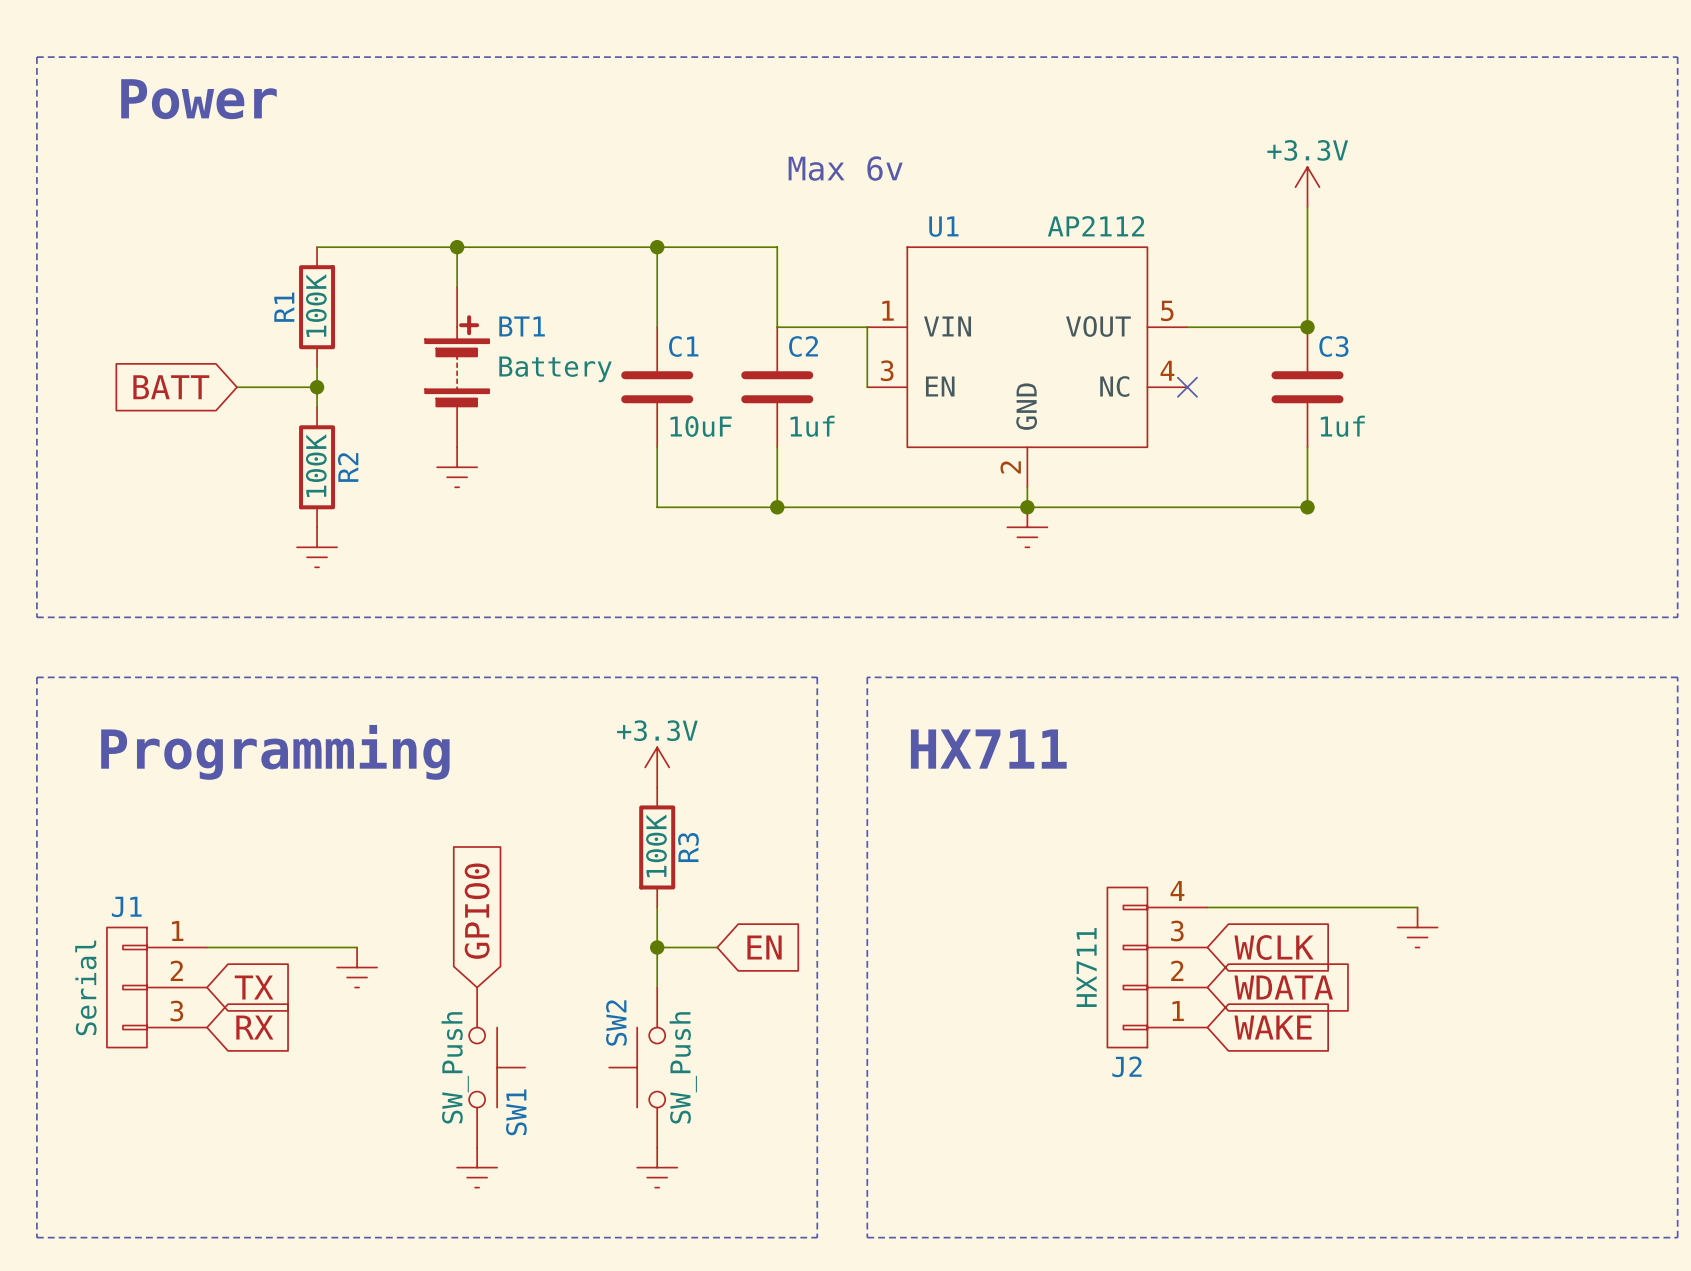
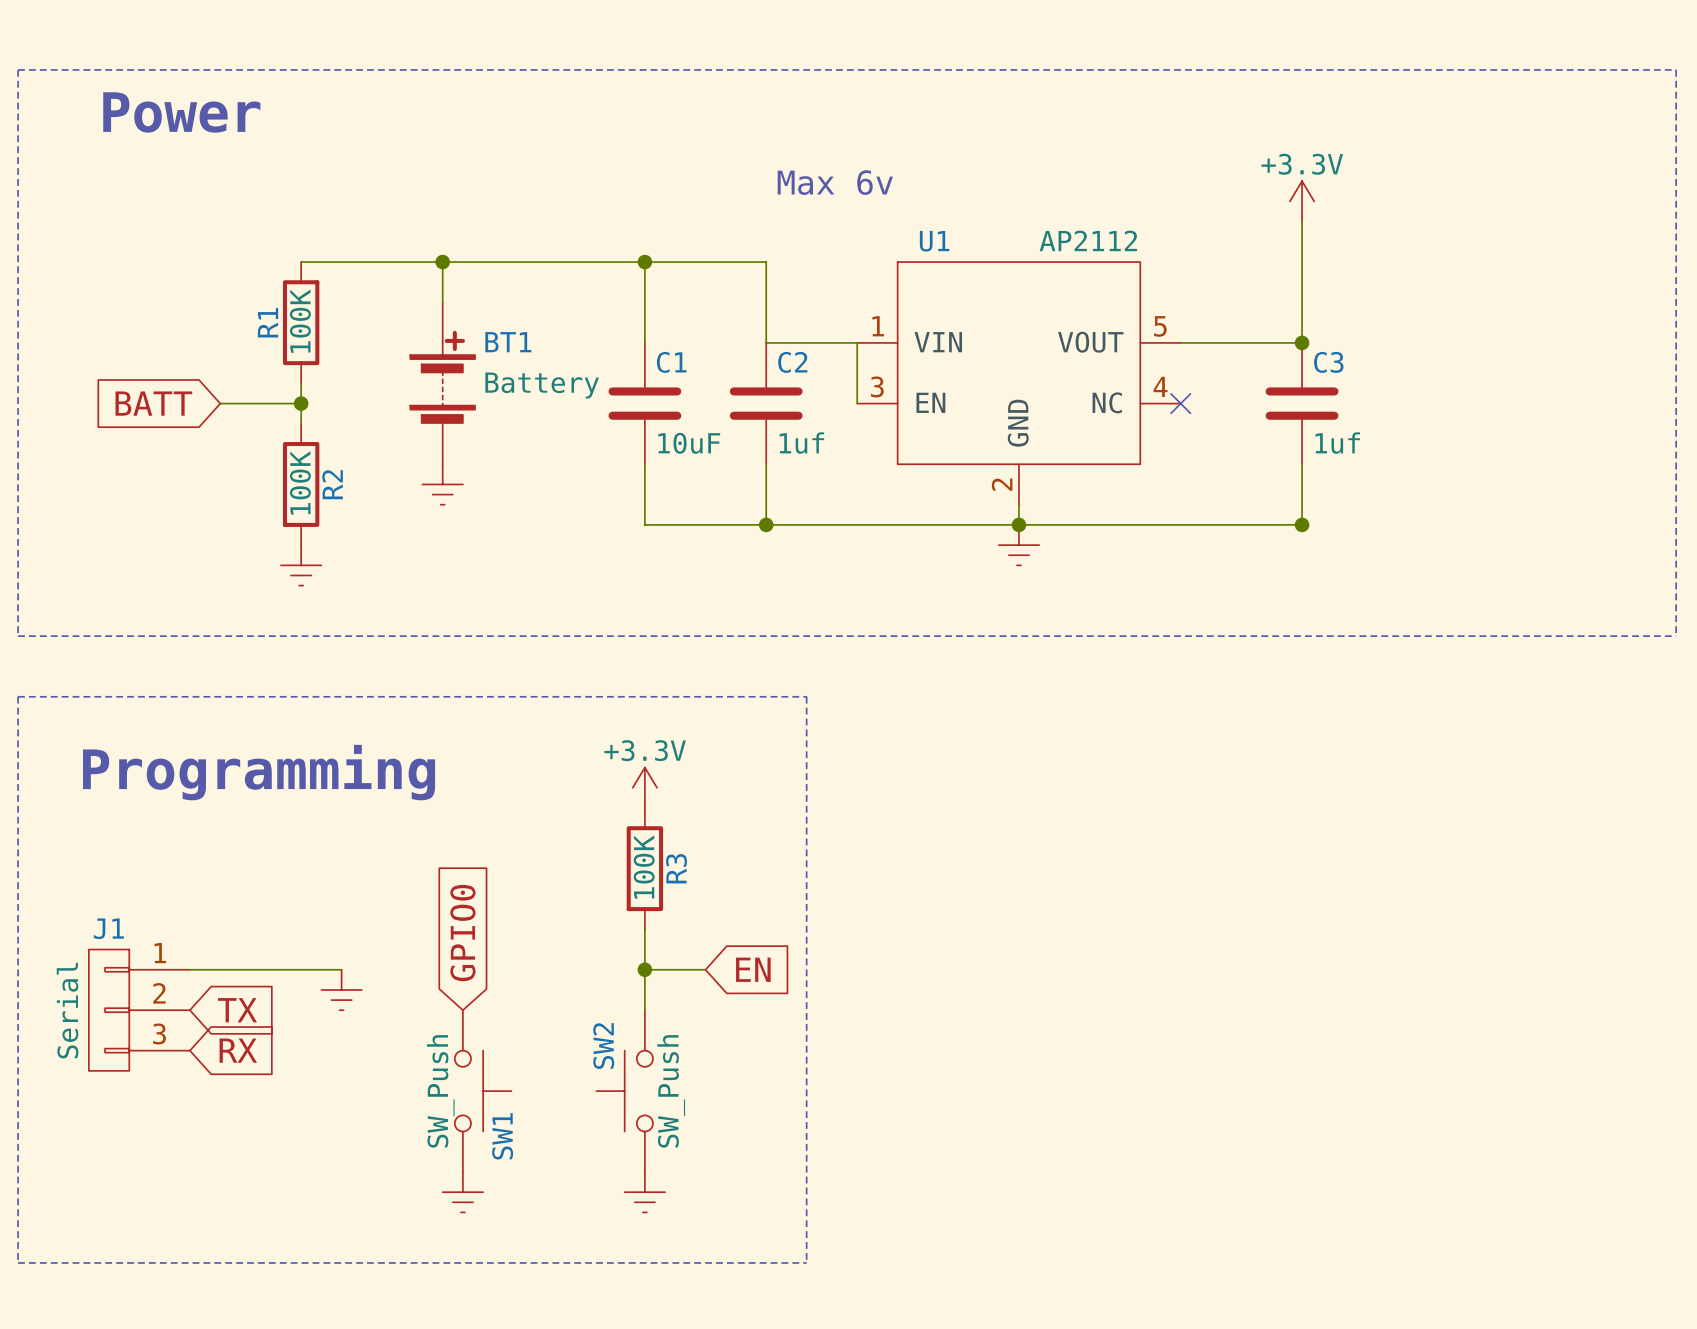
line: (867, 677) (867, 1237) (1677, 1237) (1677, 677) (867, 677) -> none
text: HX711 (988, 749) -> none
wire: (1207, 907) (1417, 907) -> none
power symbol: (1417, 927) -> none
global label: WCLK (1274, 947) -> none
J2: HX711 (1157, 967) -> none
global label: WDATA (1283, 987) -> none
global label: WAKE (1273, 1027) -> none

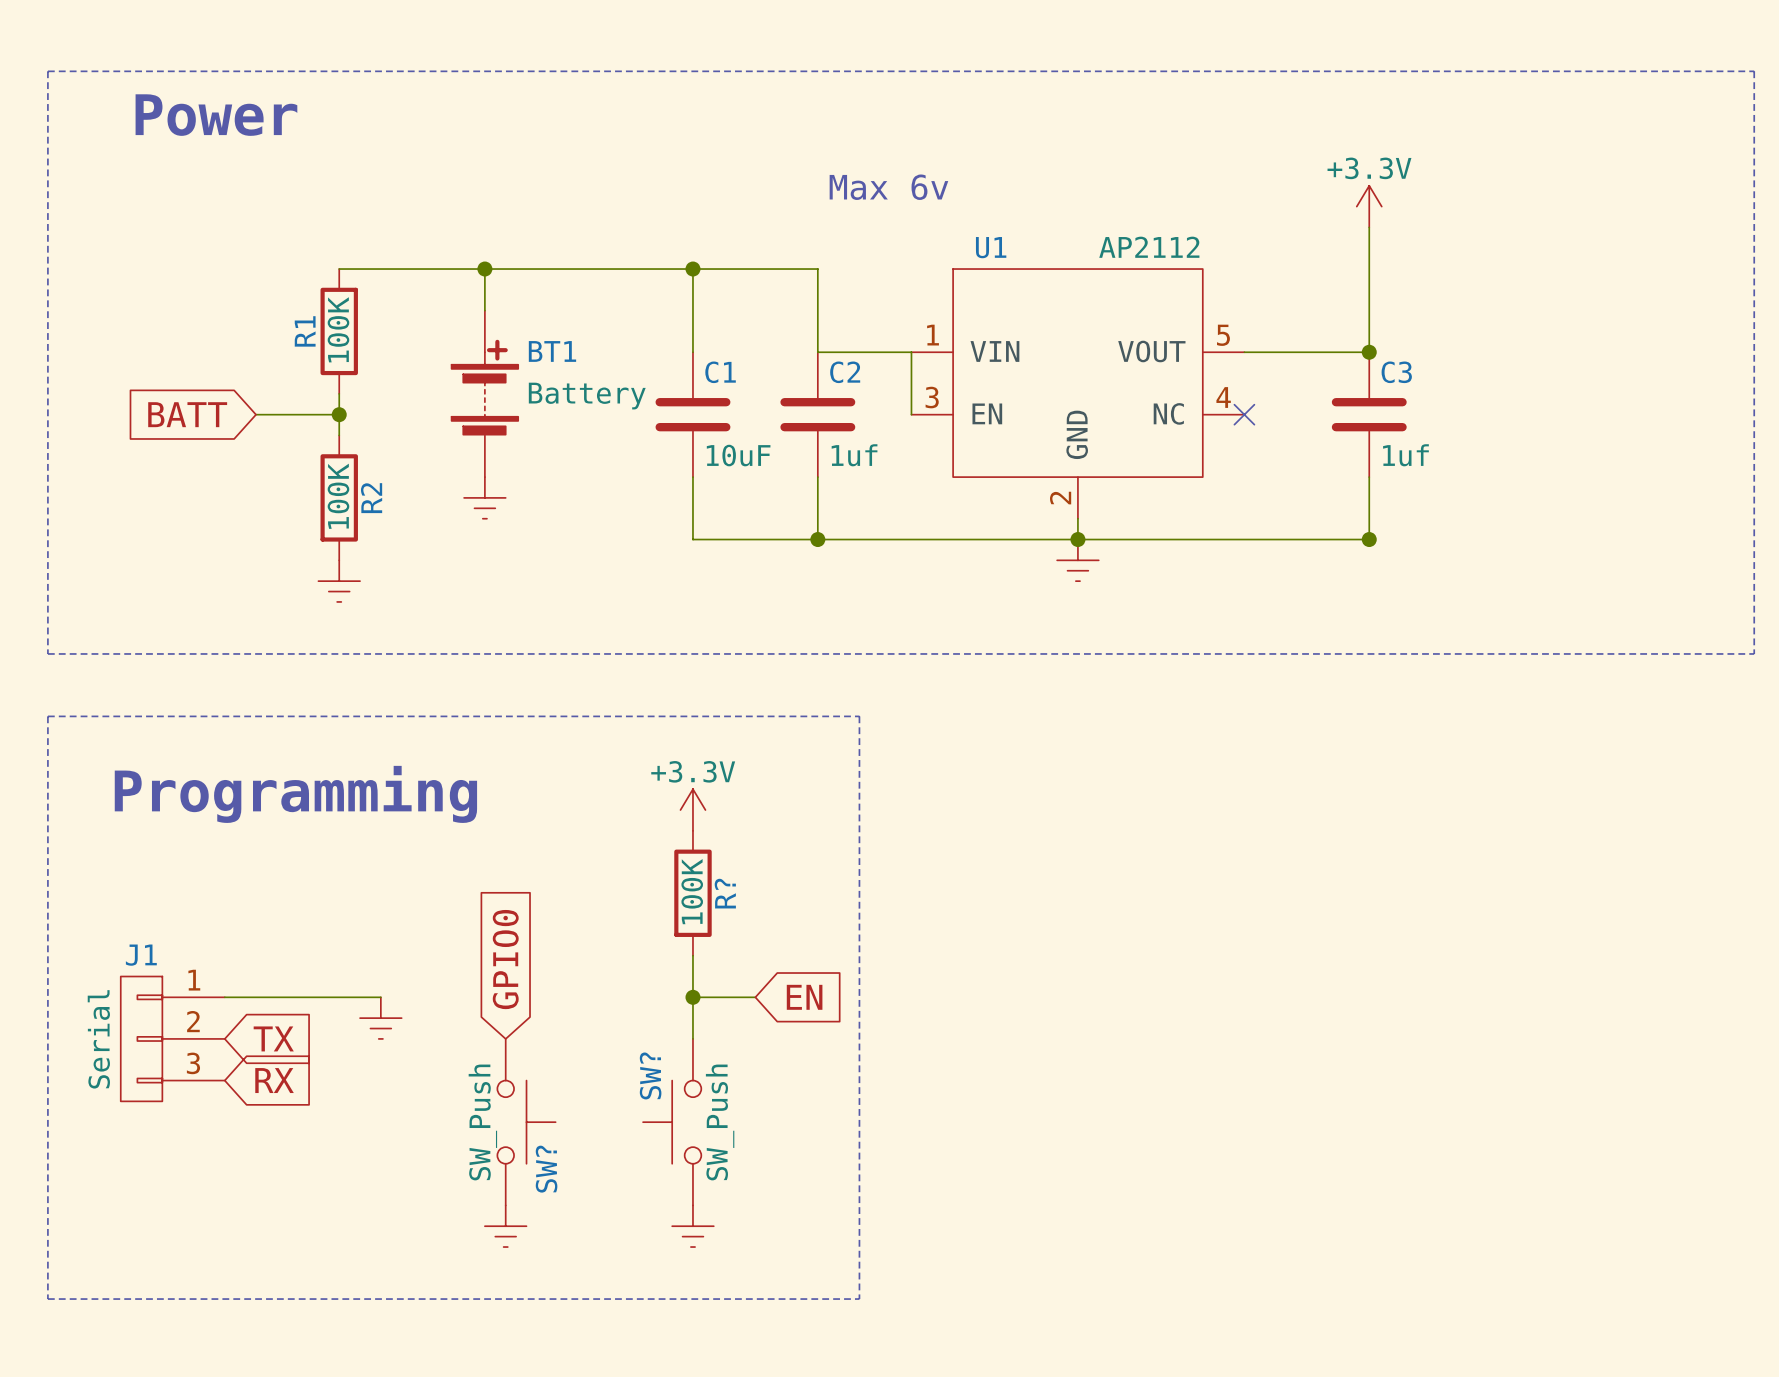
R3 name: R3 (676, 868) -> R? (725, 893)
SW2 name: SW2 (603, 1046) -> SW? (650, 1075)
SW1 name: SW1 (502, 1136) -> SW? (546, 1169)

